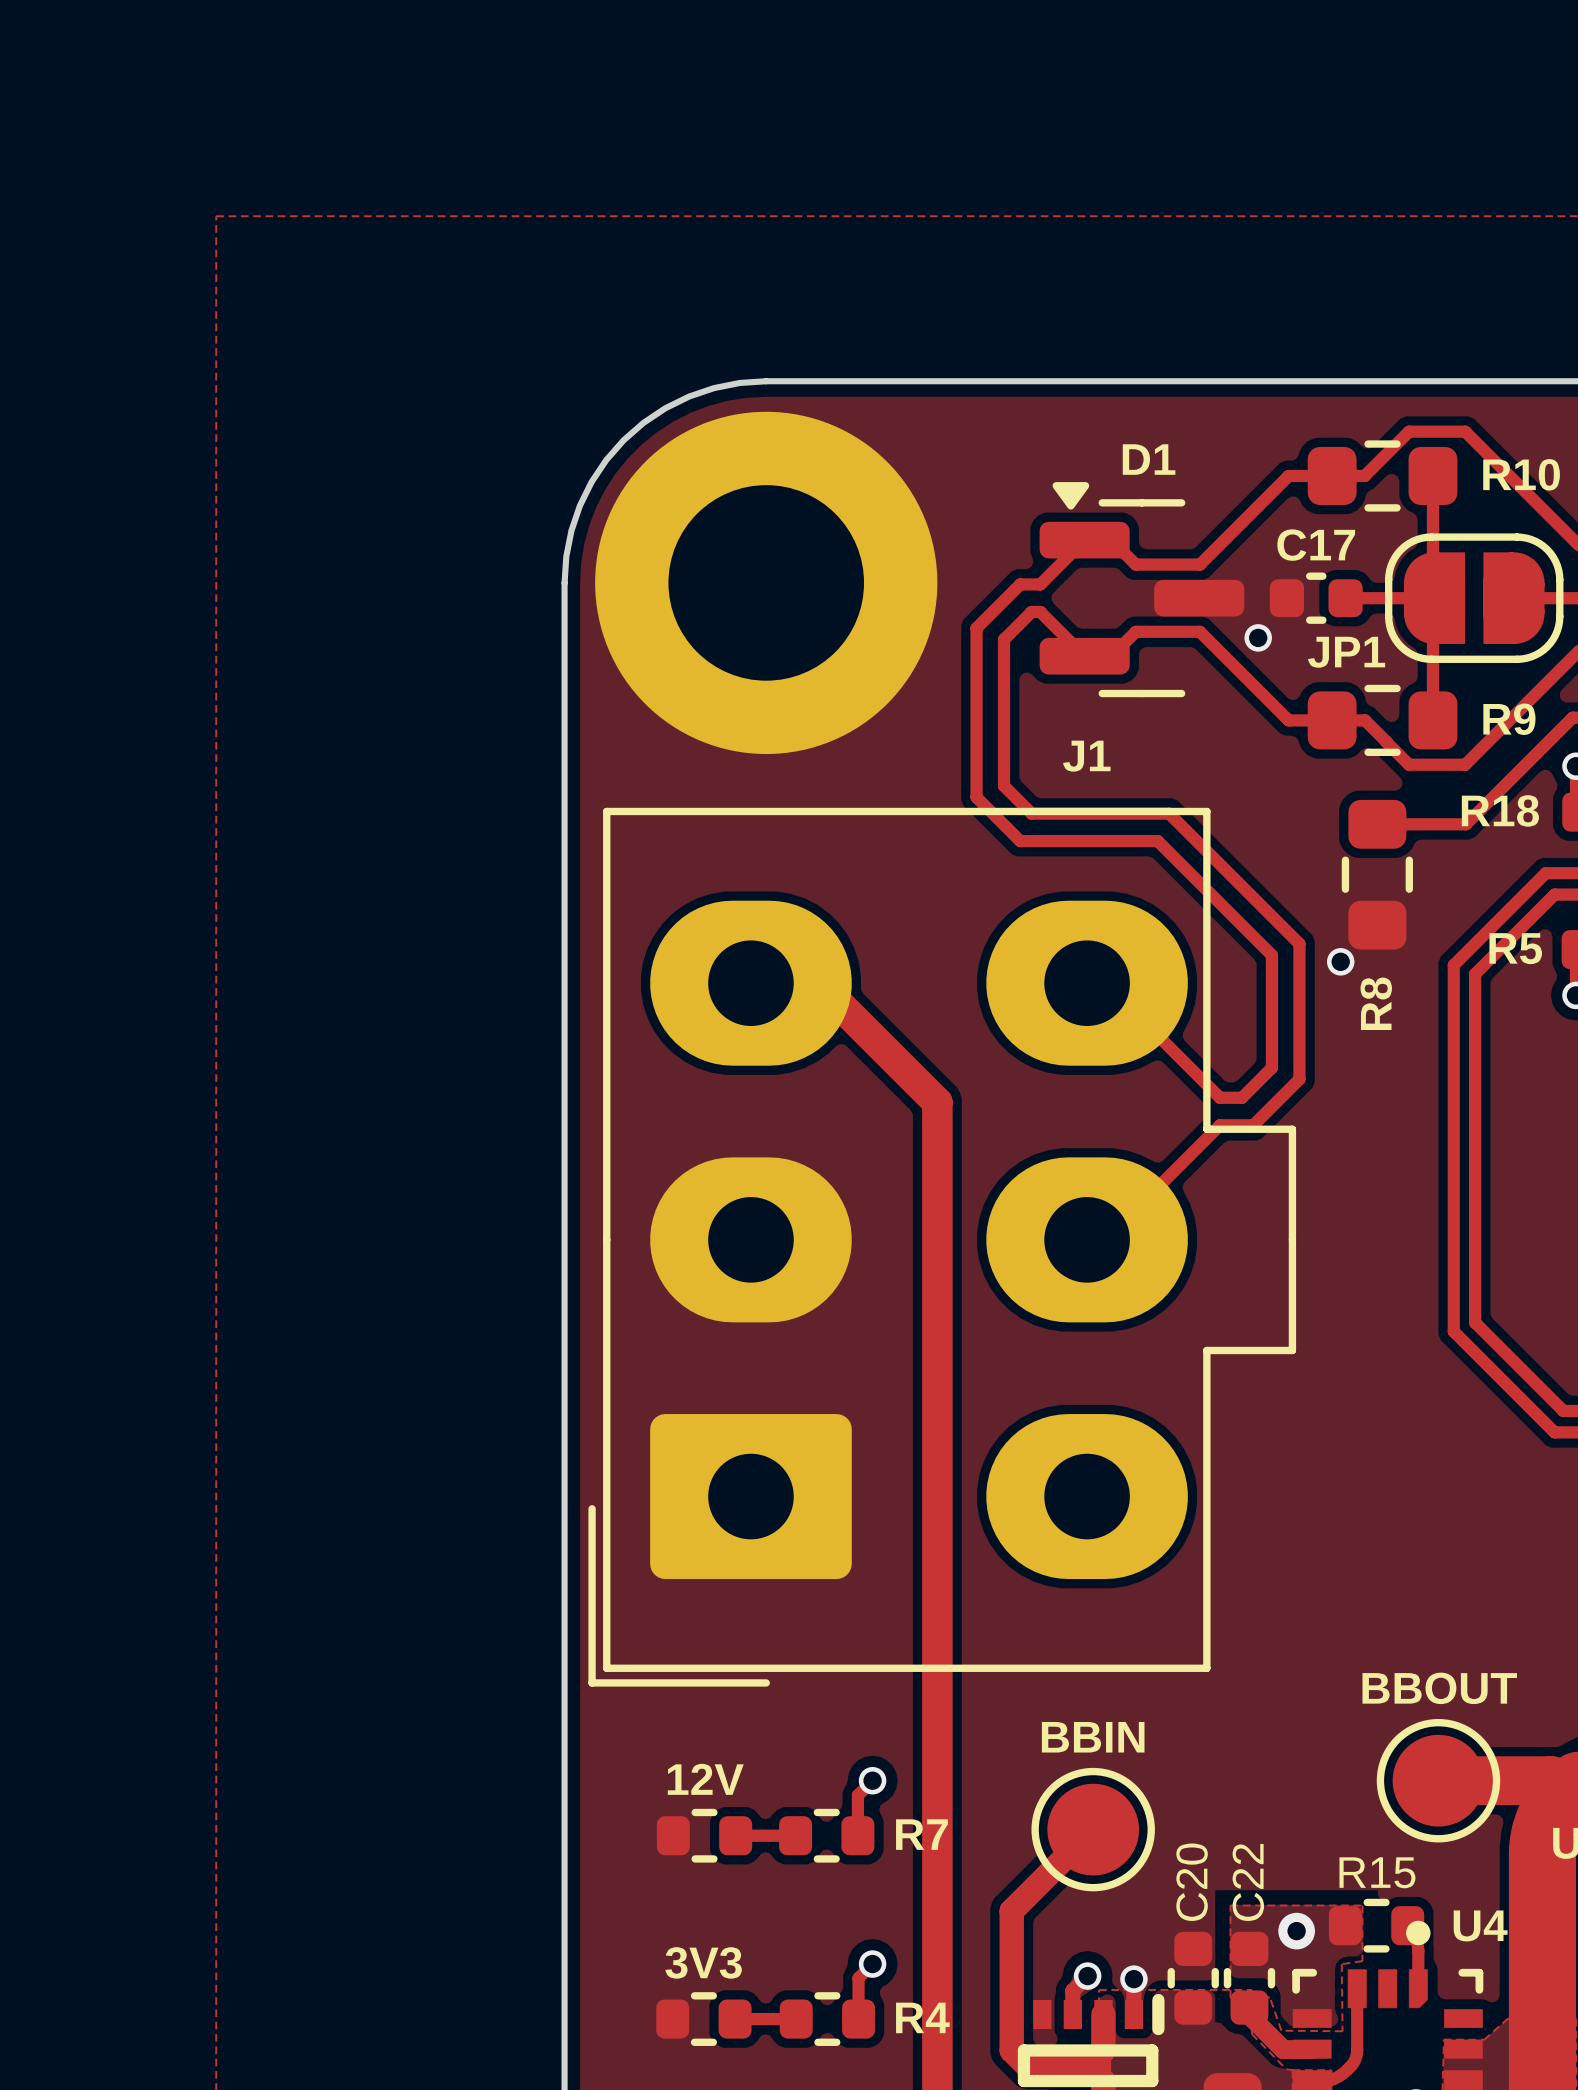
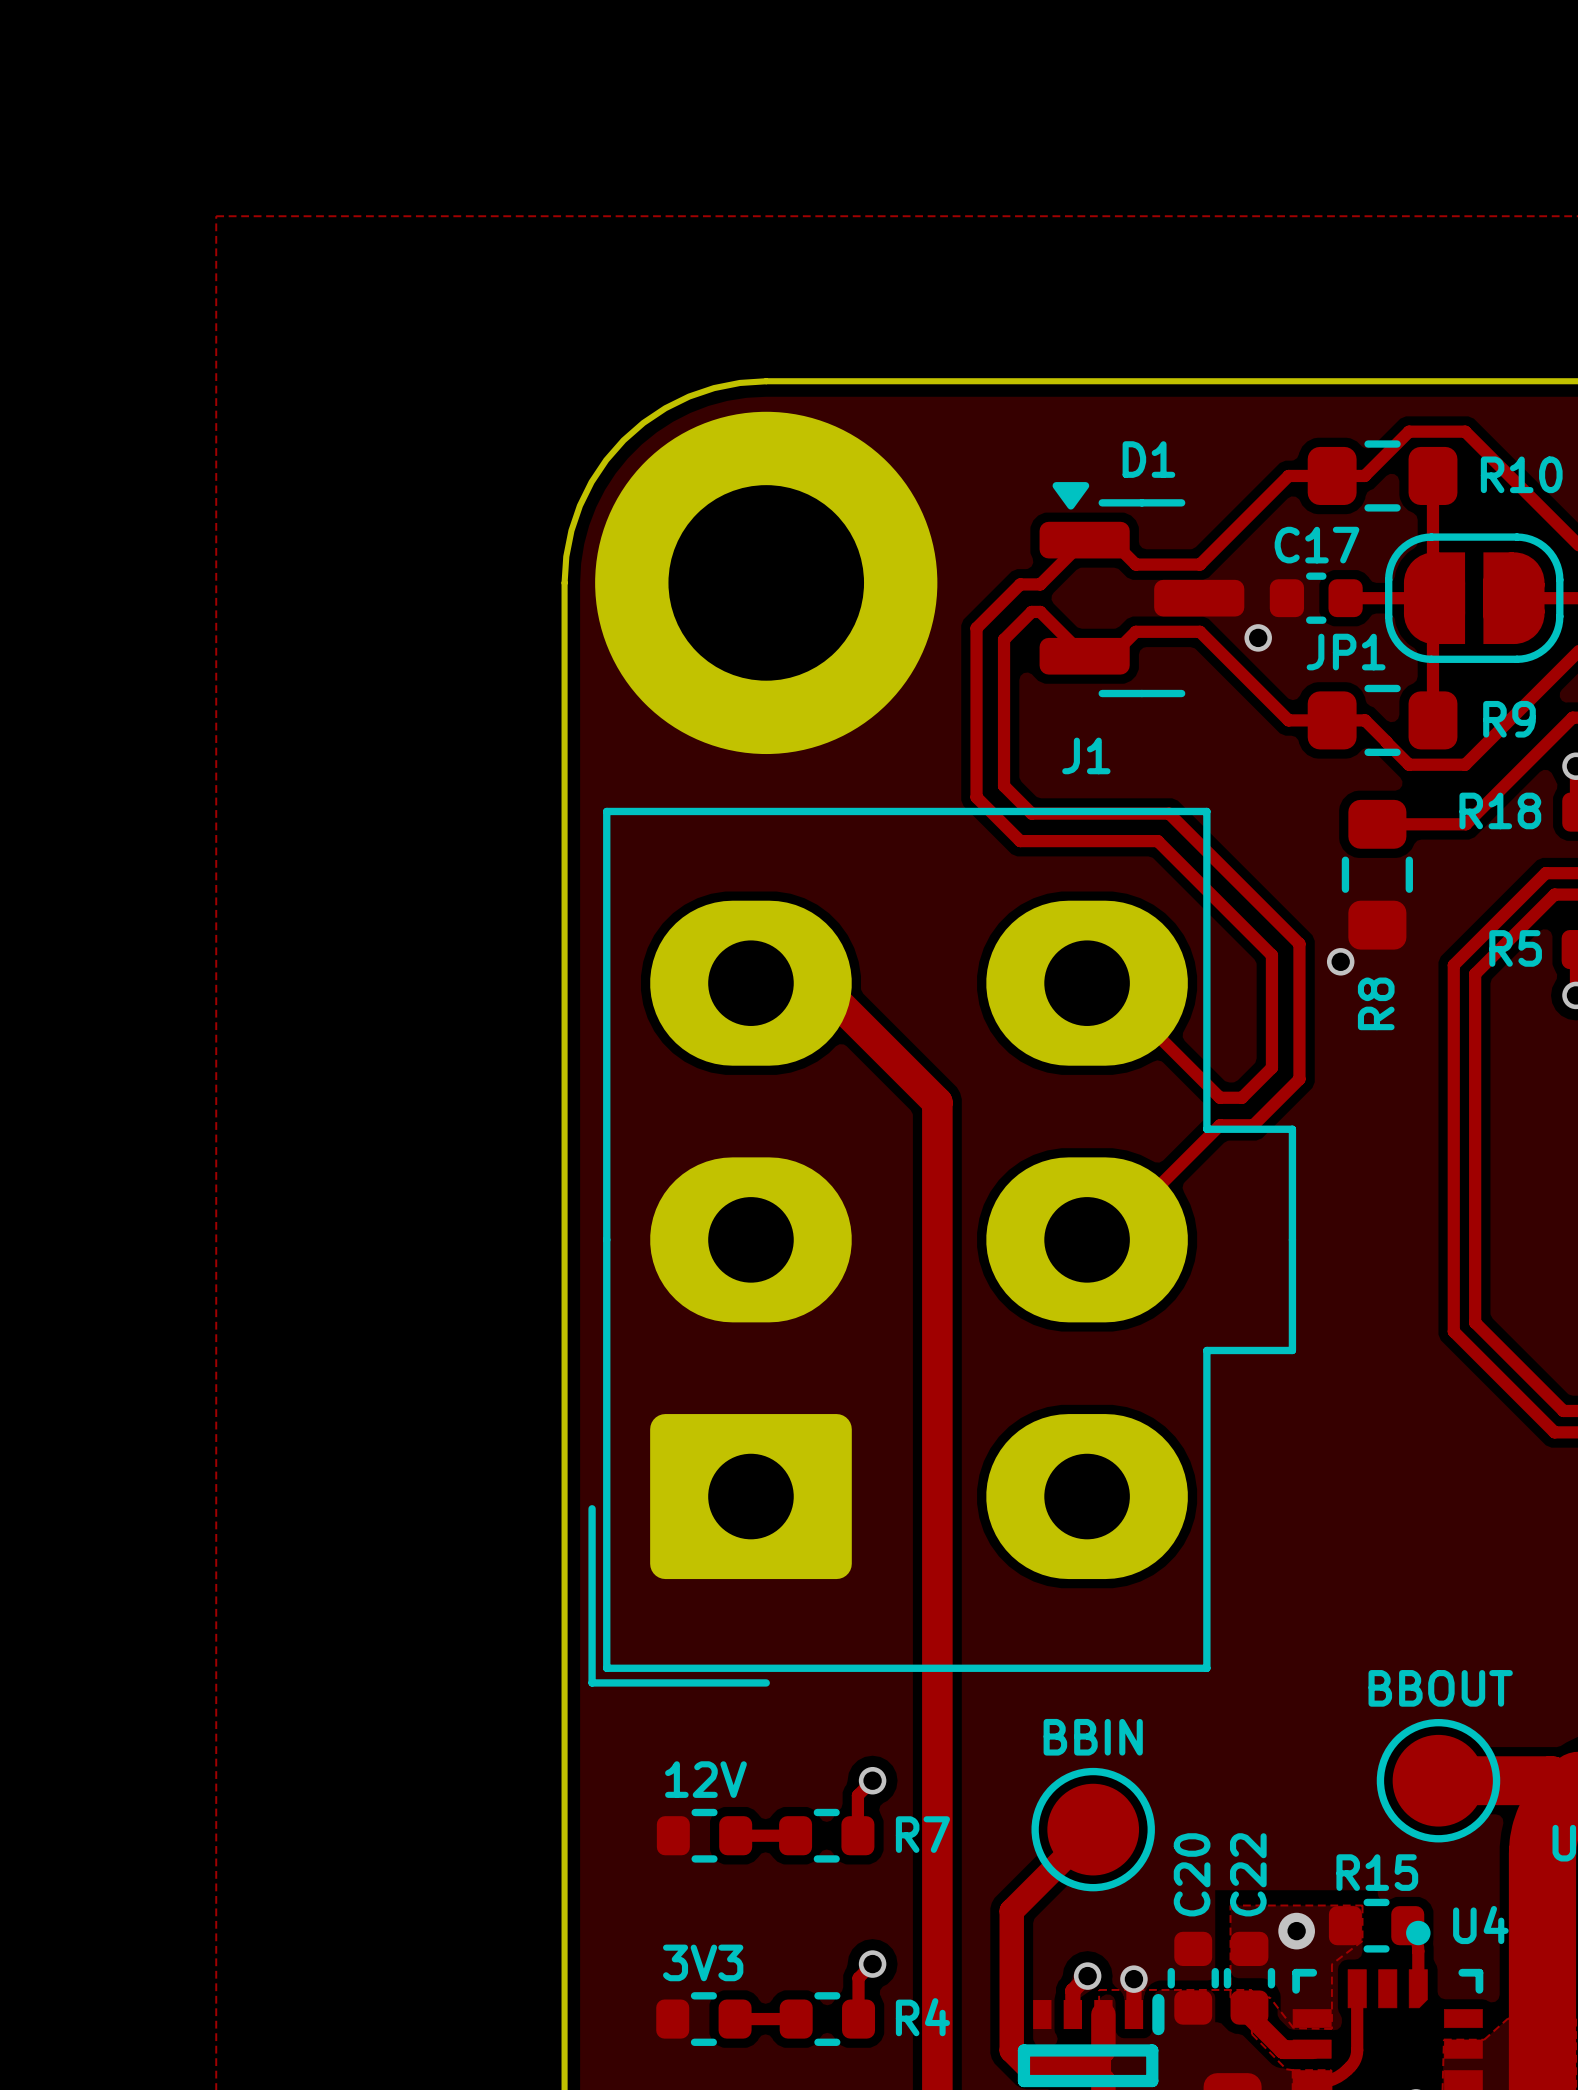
zone outline: (1362, 1905) (1362, 1961) (1341, 1964) (1342, 2031) (1281, 2030) (1269, 1997) -> (1362, 1905) (1362, 1940) (1331, 1964) (1331, 2028) (1293, 2028) (1269, 1997)

